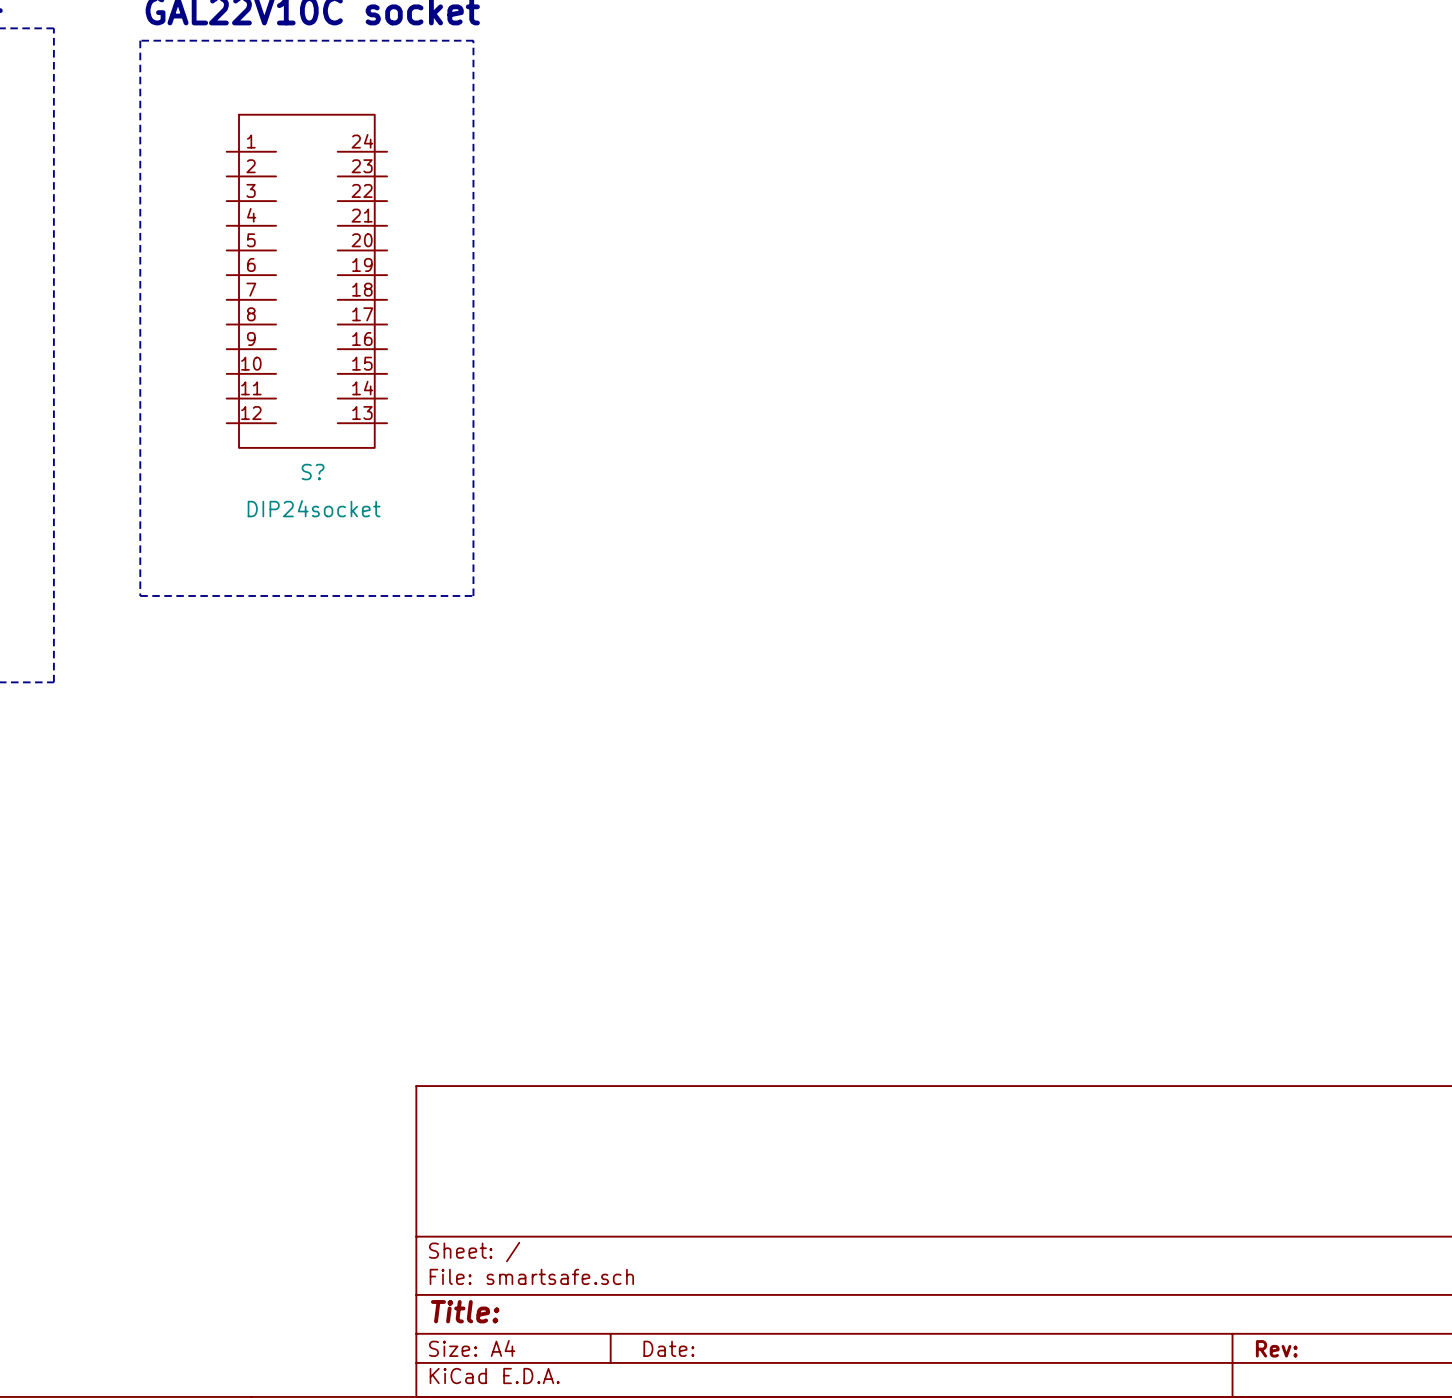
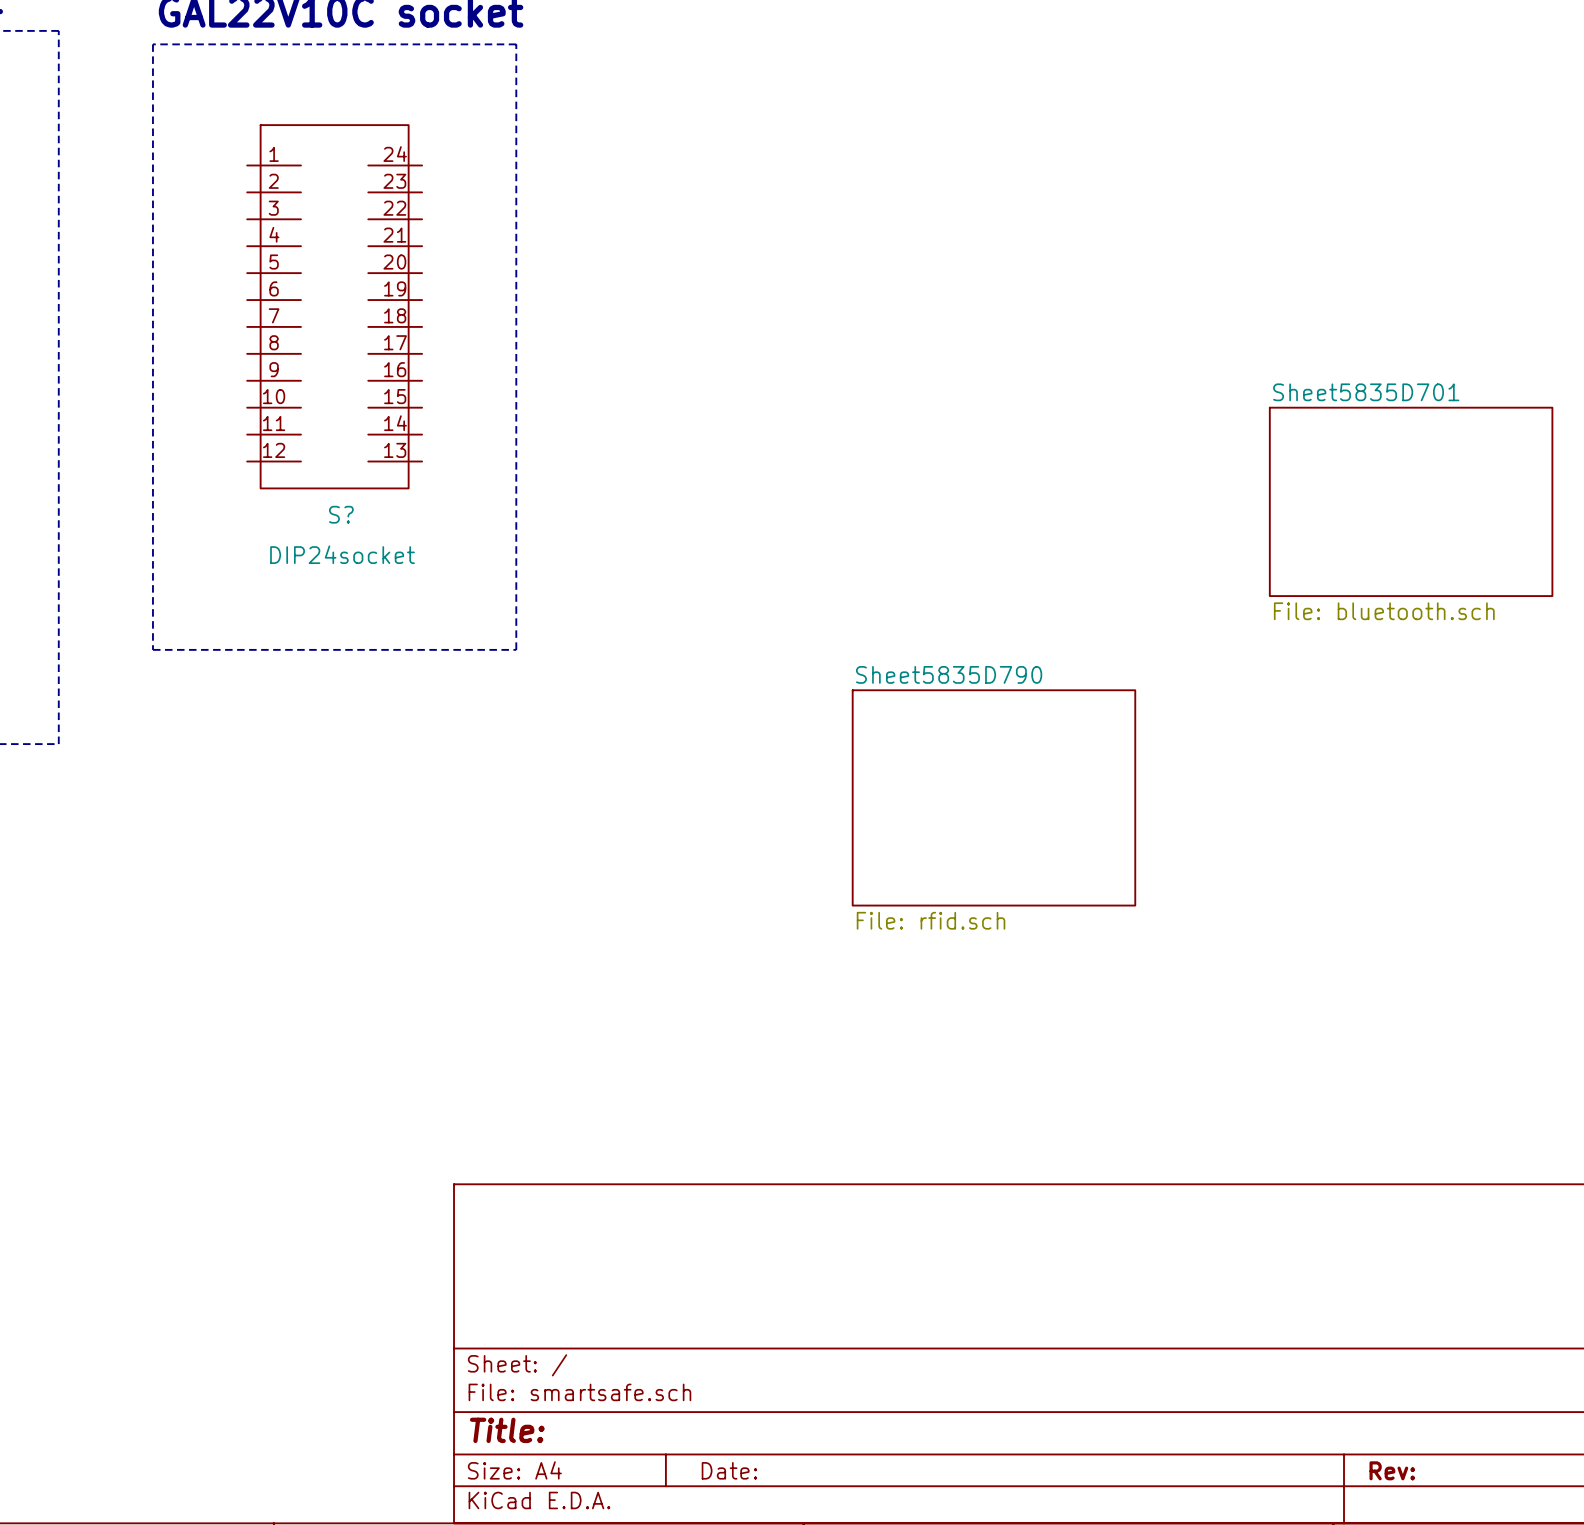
sheet Sheet5835D701: none -> File: bluetooth.sch (1411, 501)
sheet Sheet5835D790: none -> File: rfid.sch (993, 797)

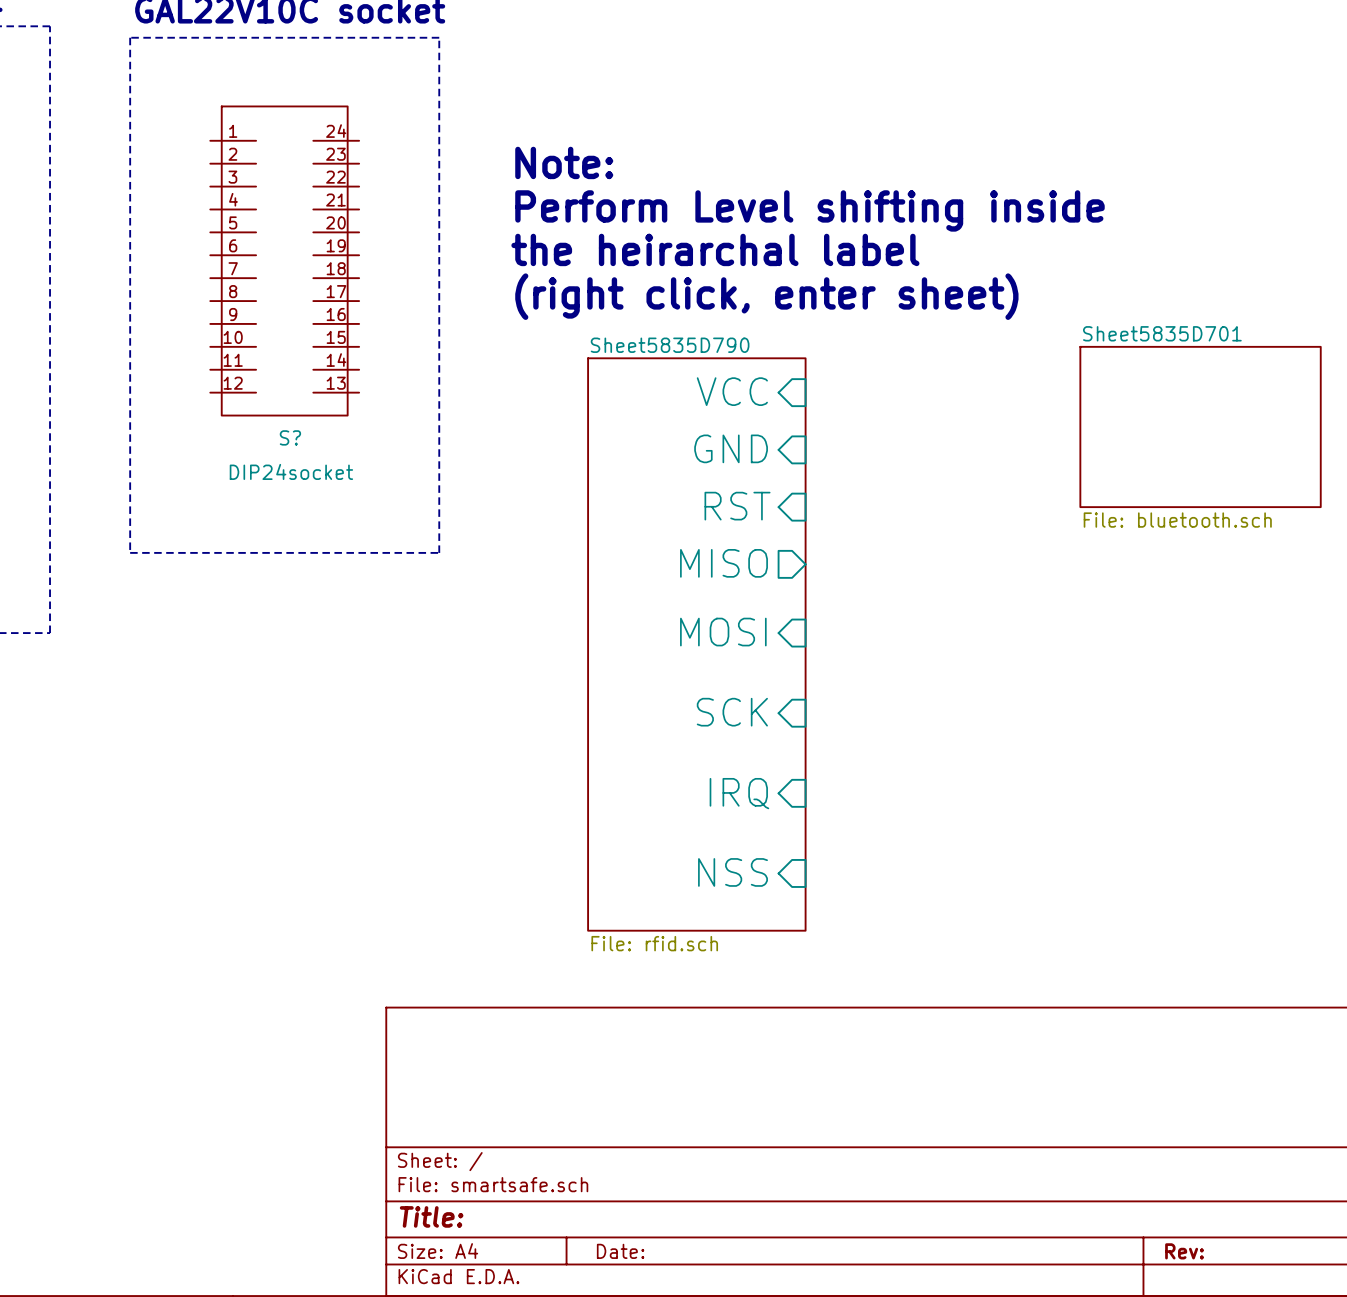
text: none -> Note: (564, 162)
text: none -> Perform Level shifting inside (809, 210)
text: none -> the heirarchal label (715, 249)
text: none -> (right click, enter sheet) (766, 296)
sheet pin: none -> VCC (732, 391)
sheet pin: none -> GND (731, 448)
sheet pin: none -> RST (737, 506)
sheet pin: none -> MISO (724, 563)
sheet Sheet5835D790 name position: Sheet5835D790 (949, 674) -> Sheet5835D790 (670, 345)
sheet Sheet5835D790 shape: [852, 690, 1136, 906] -> [588, 358, 806, 931]
sheet pin: none -> MOSI (723, 632)
sheet pin: none -> SCK (732, 712)
sheet Sheet5835D790 value position: File: rfid.sch (931, 920) -> File: rfid.sch (654, 943)
sheet pin: none -> IRQ (739, 793)
sheet pin: none -> NSS (733, 872)

